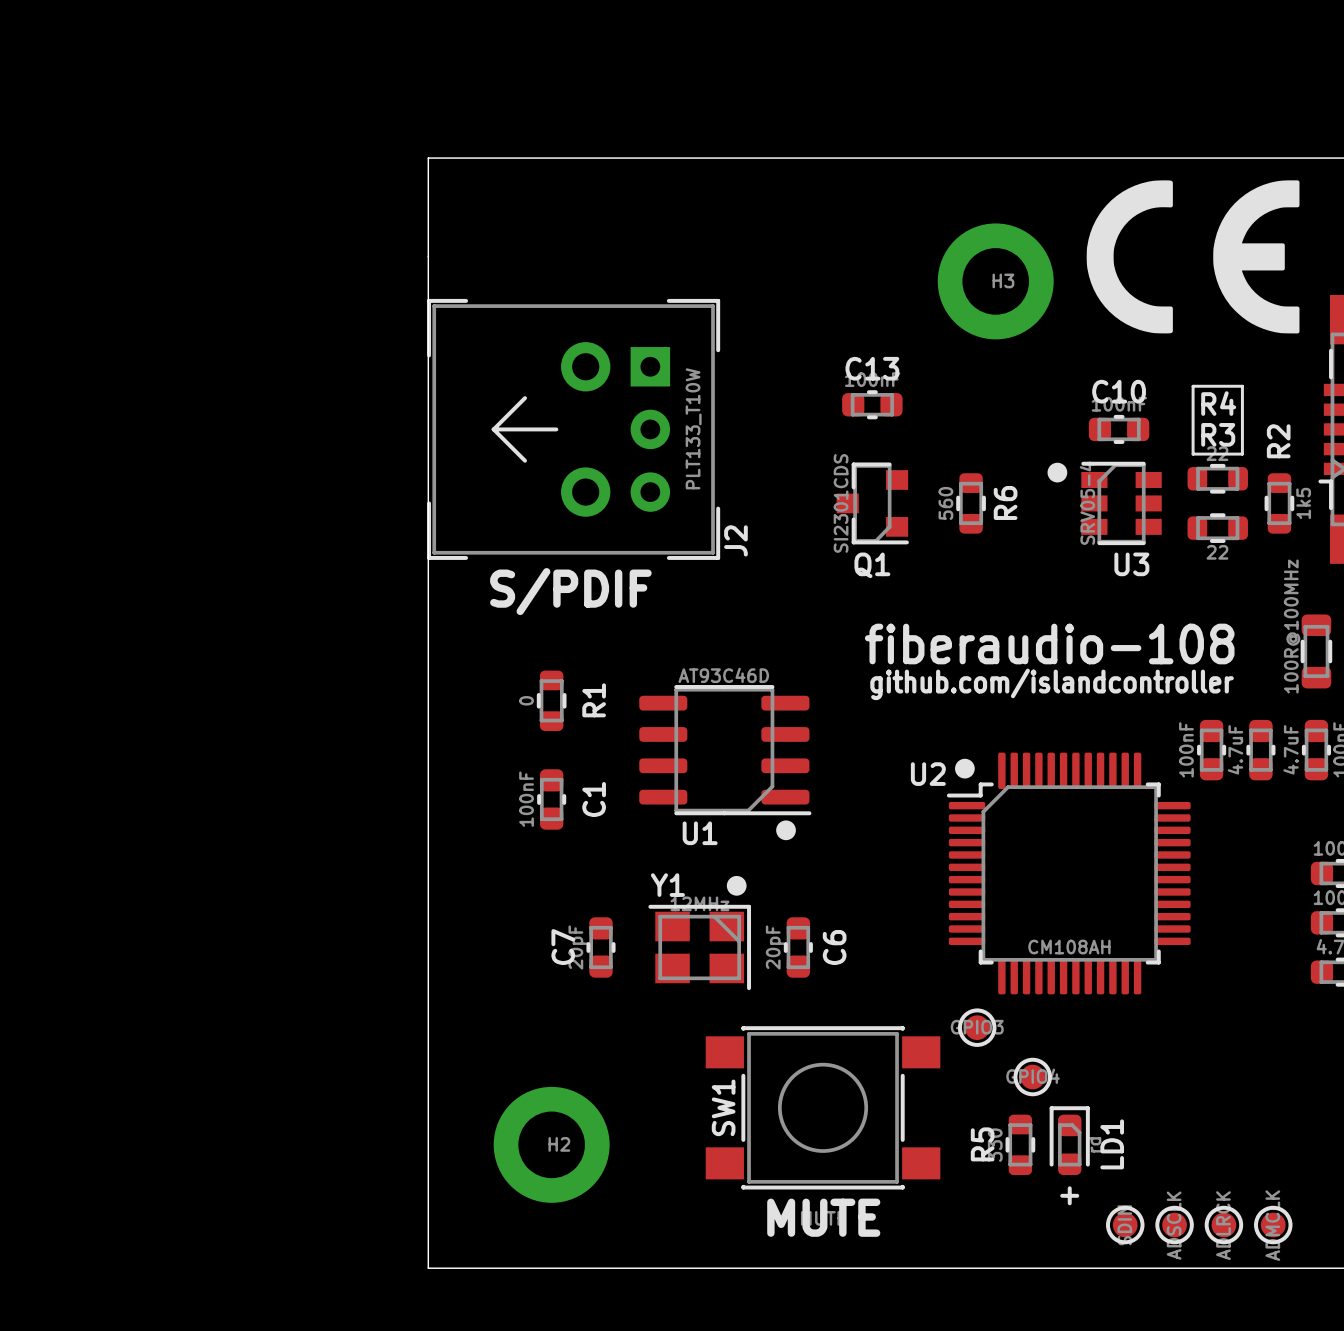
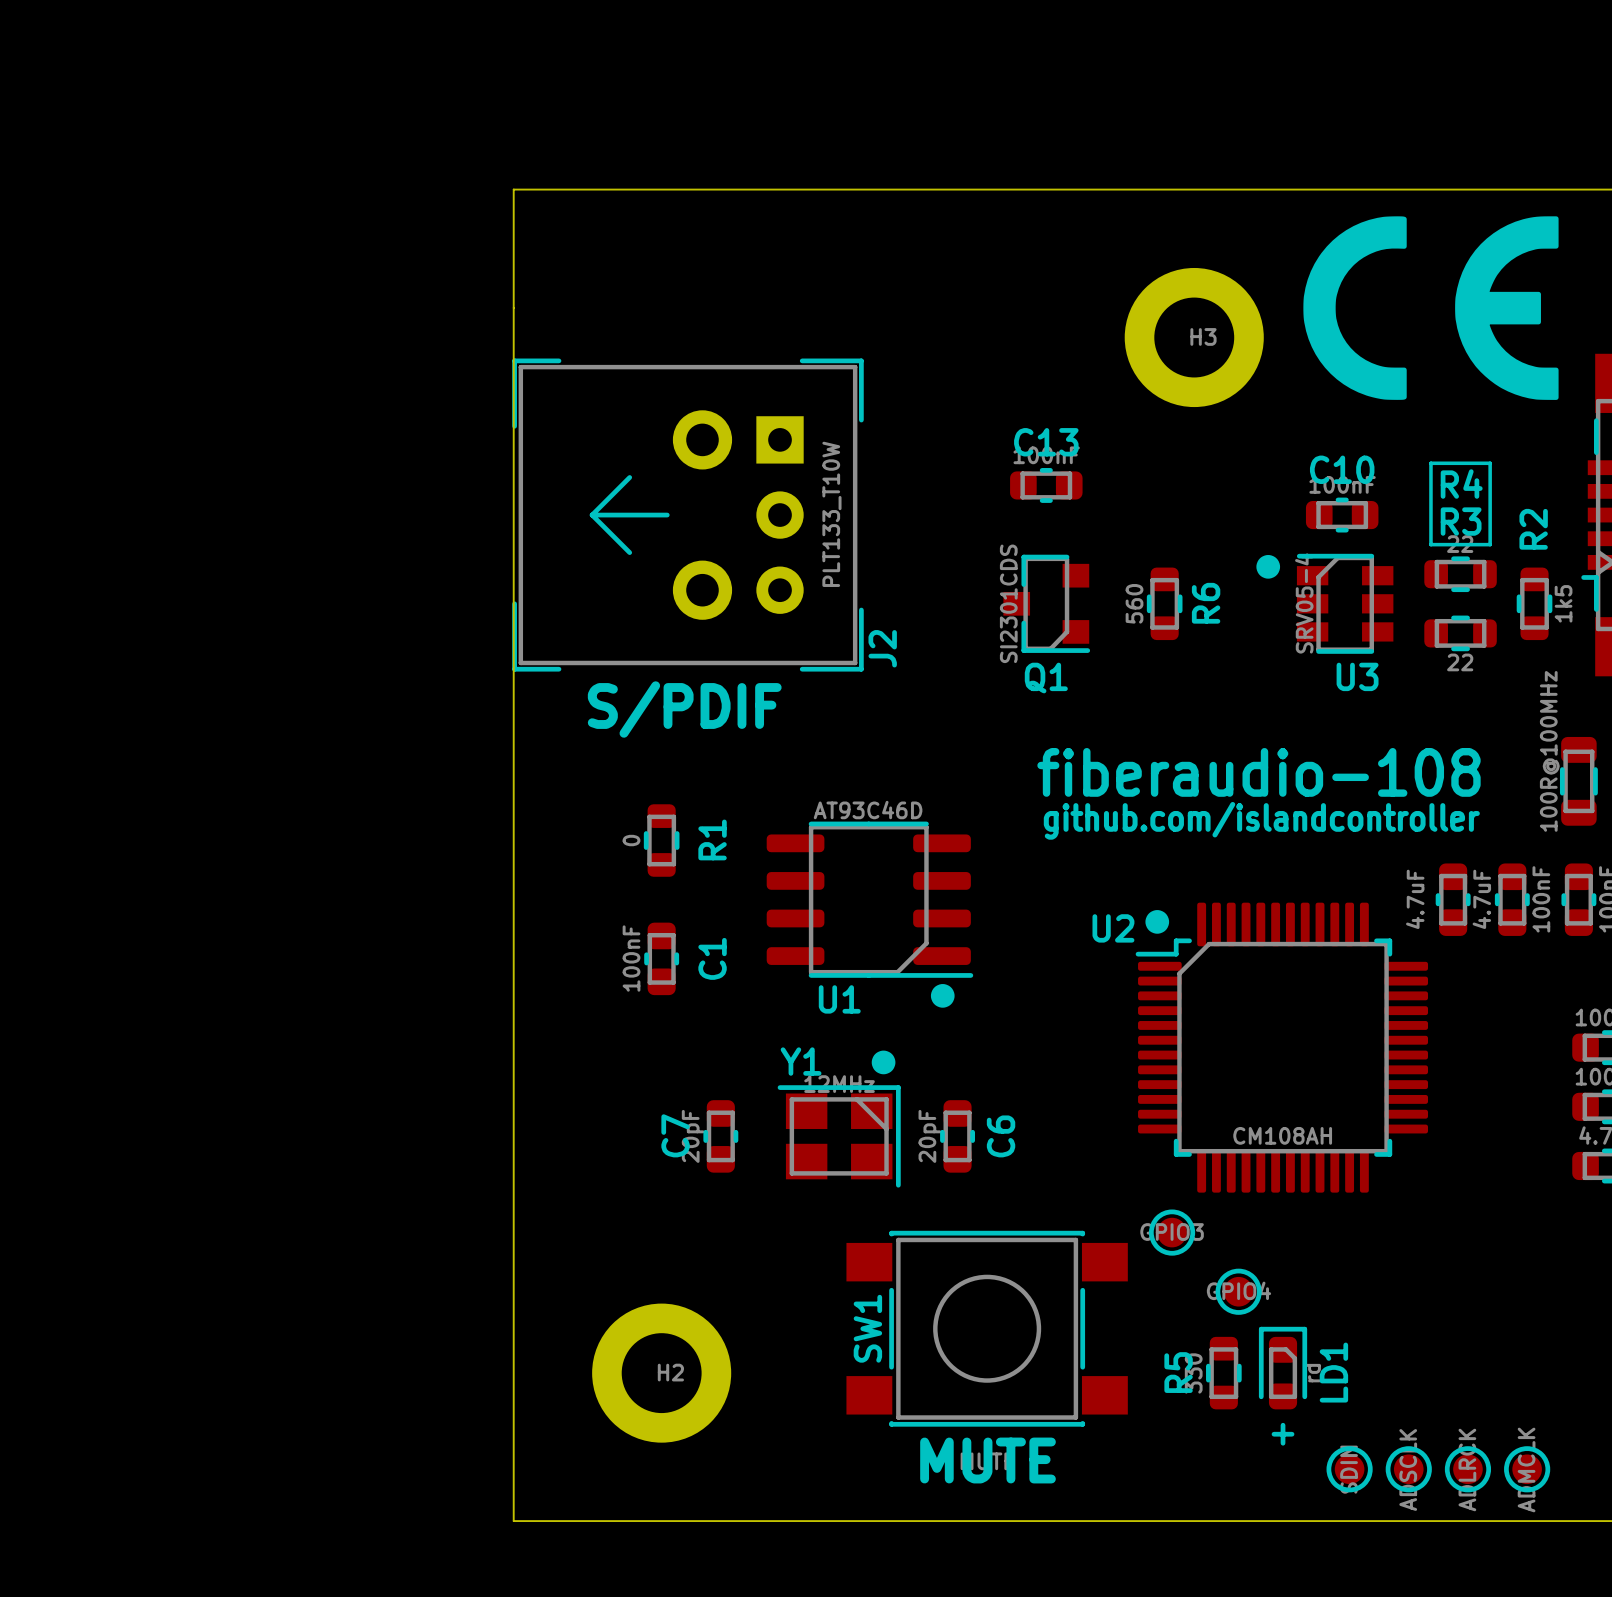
part value: 100nF (1186, 749) -> 4.7uF (1415, 899)
part value: 4.7uF (1291, 749) -> 100nF (1541, 899)

